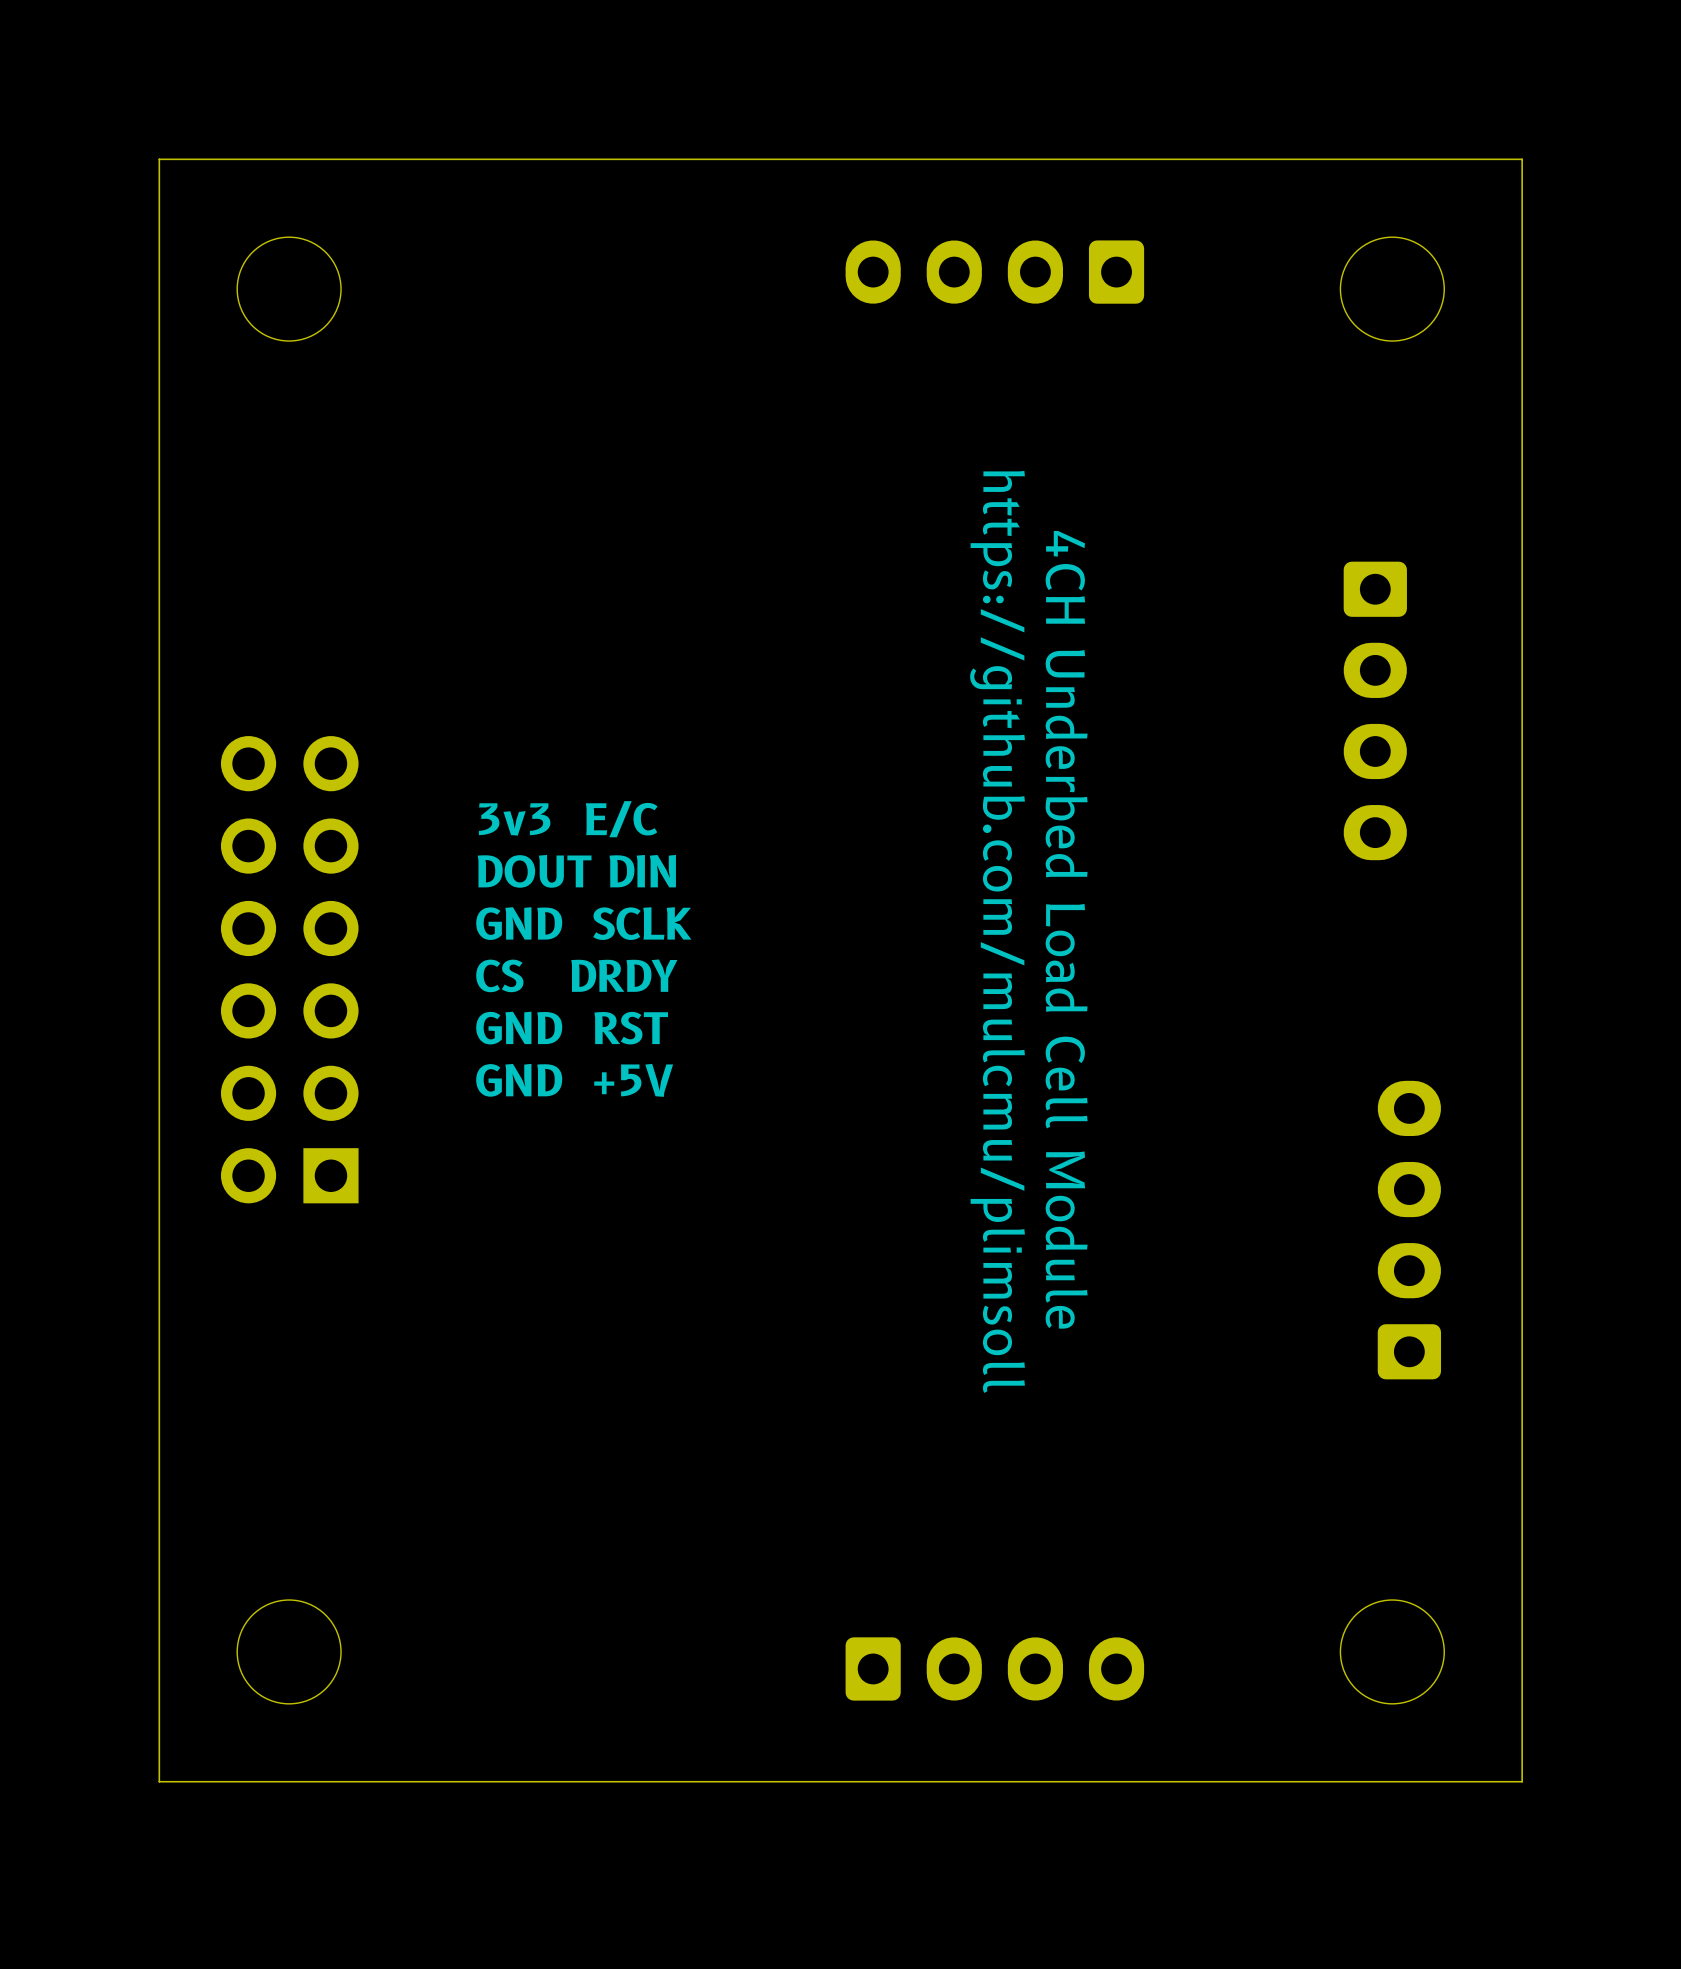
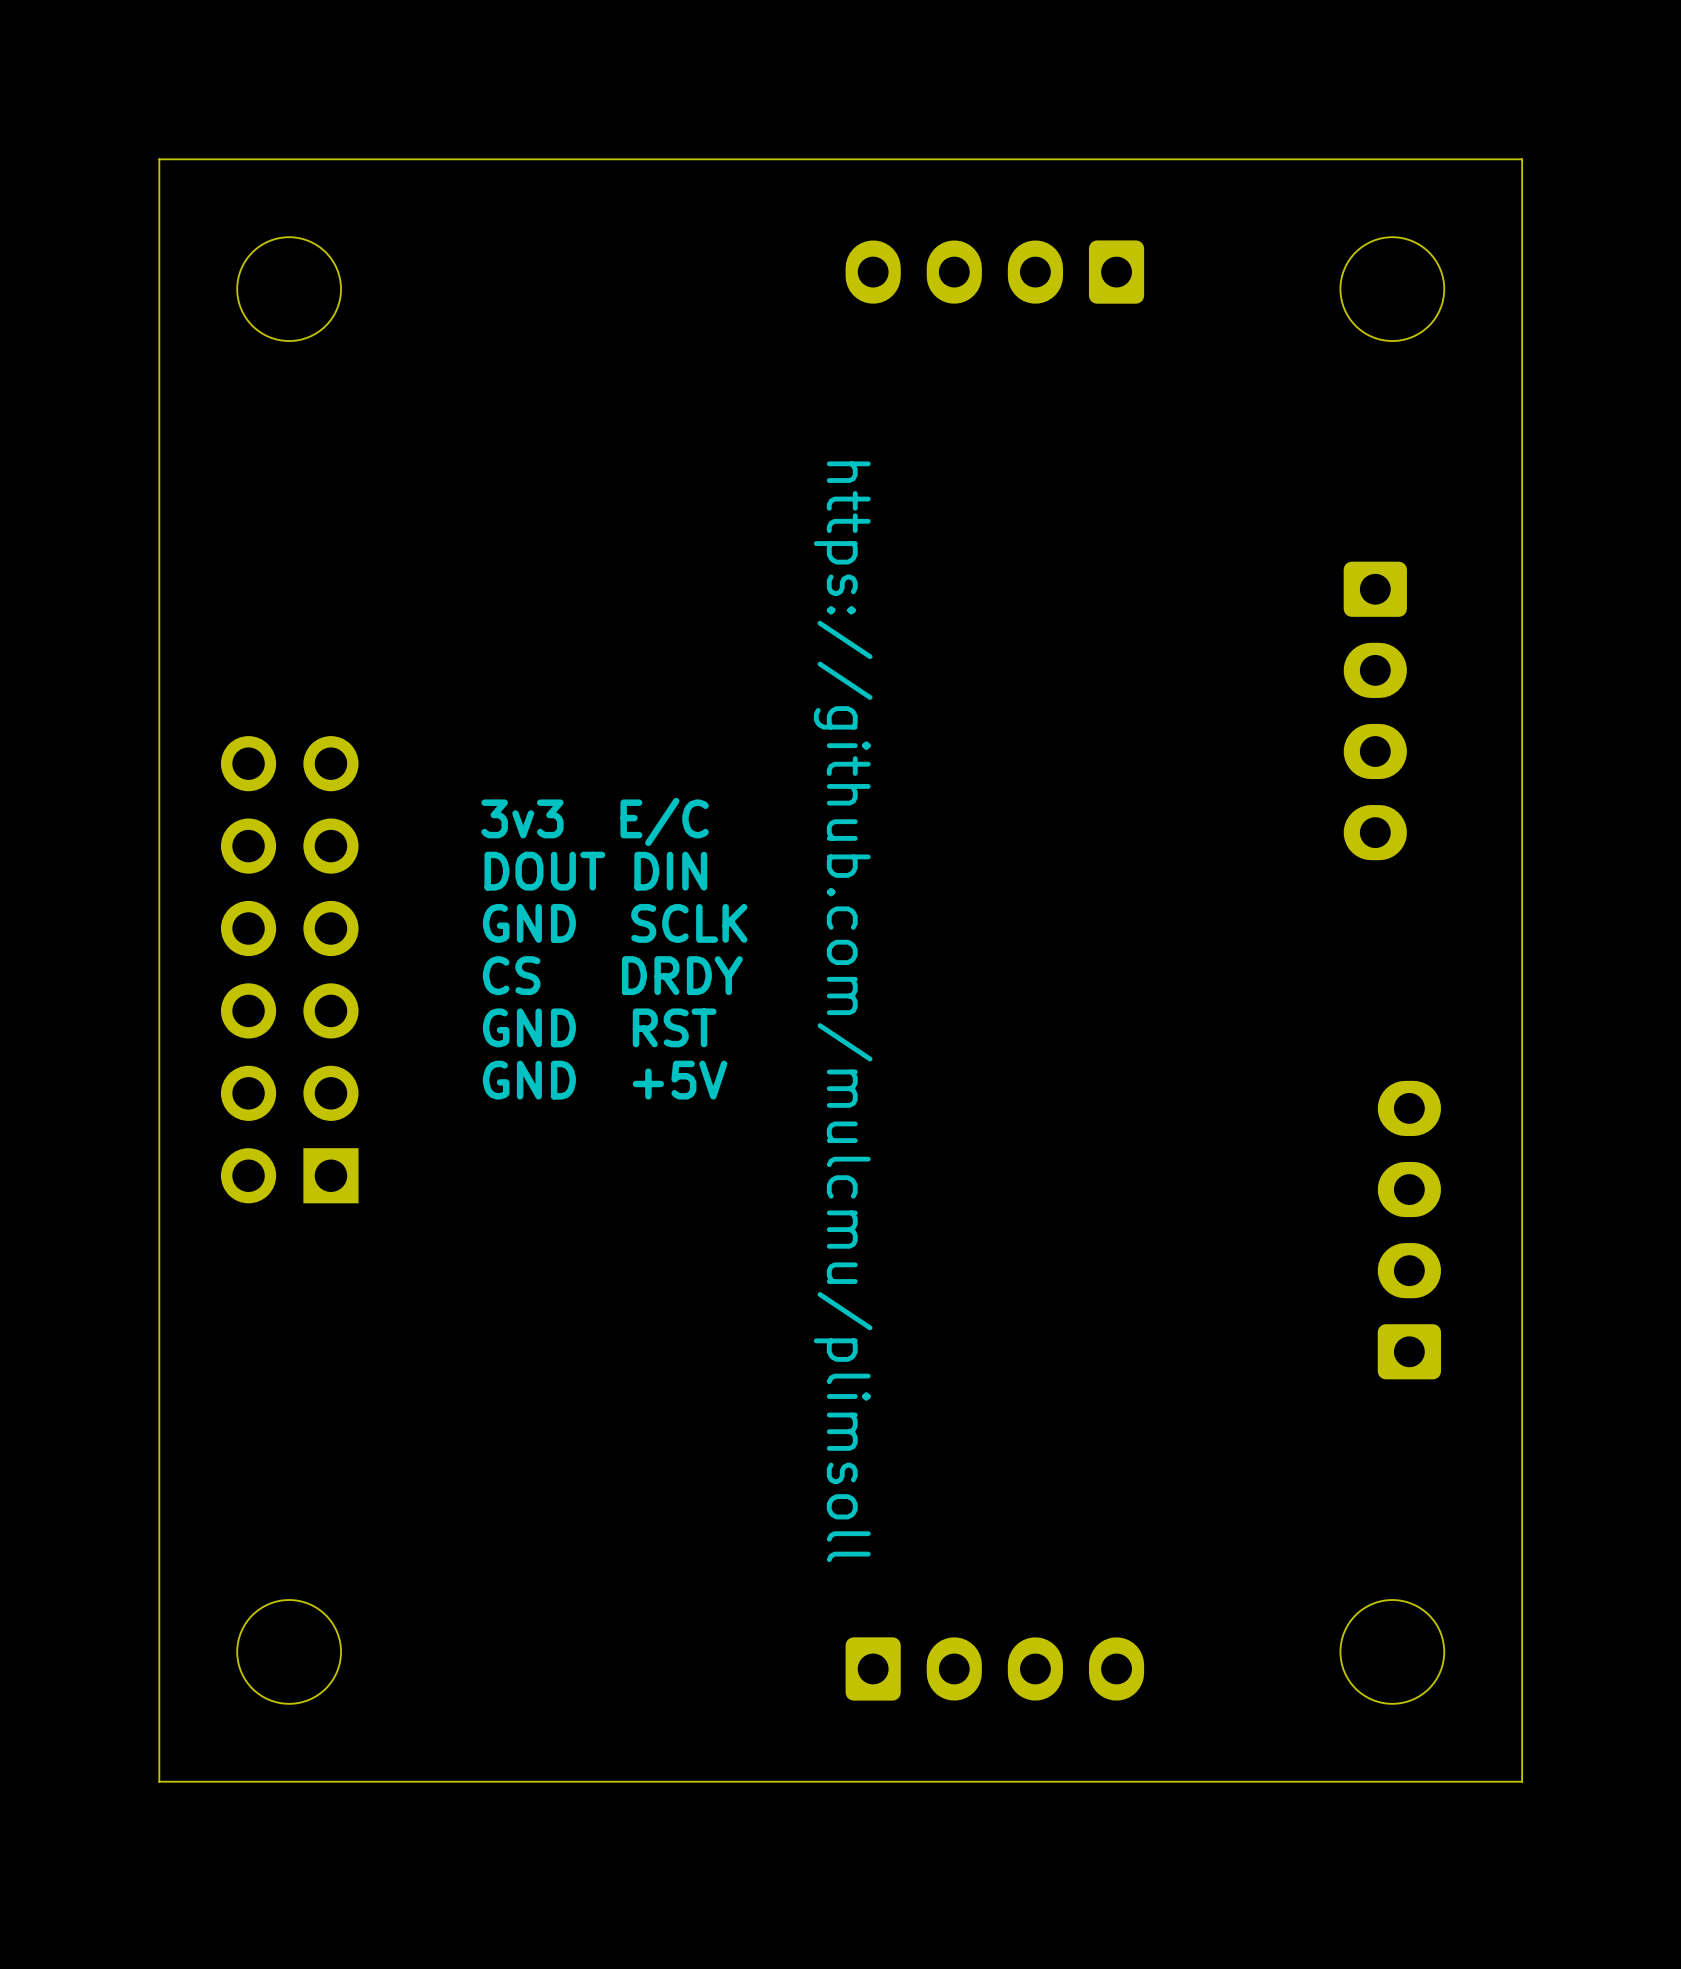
text: 4CH Underbed Load Cell Module (1066, 929) -> none
text position: https://github.com/mulcmu/plimsoll (997, 931) -> https://github.com/mulcmu/plimsoll (843, 1011)

